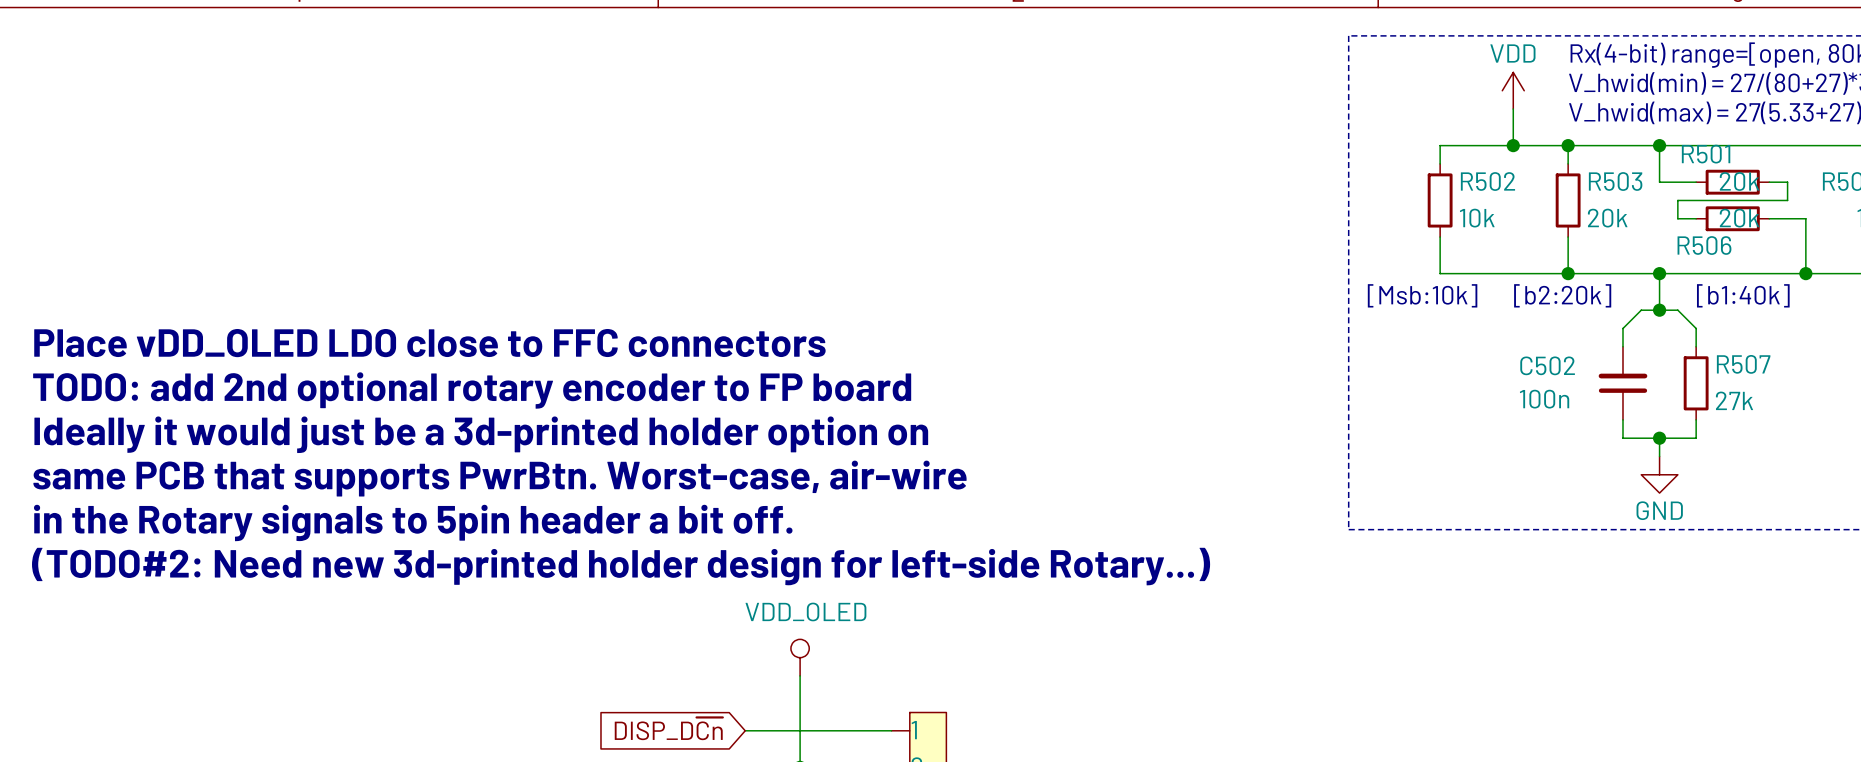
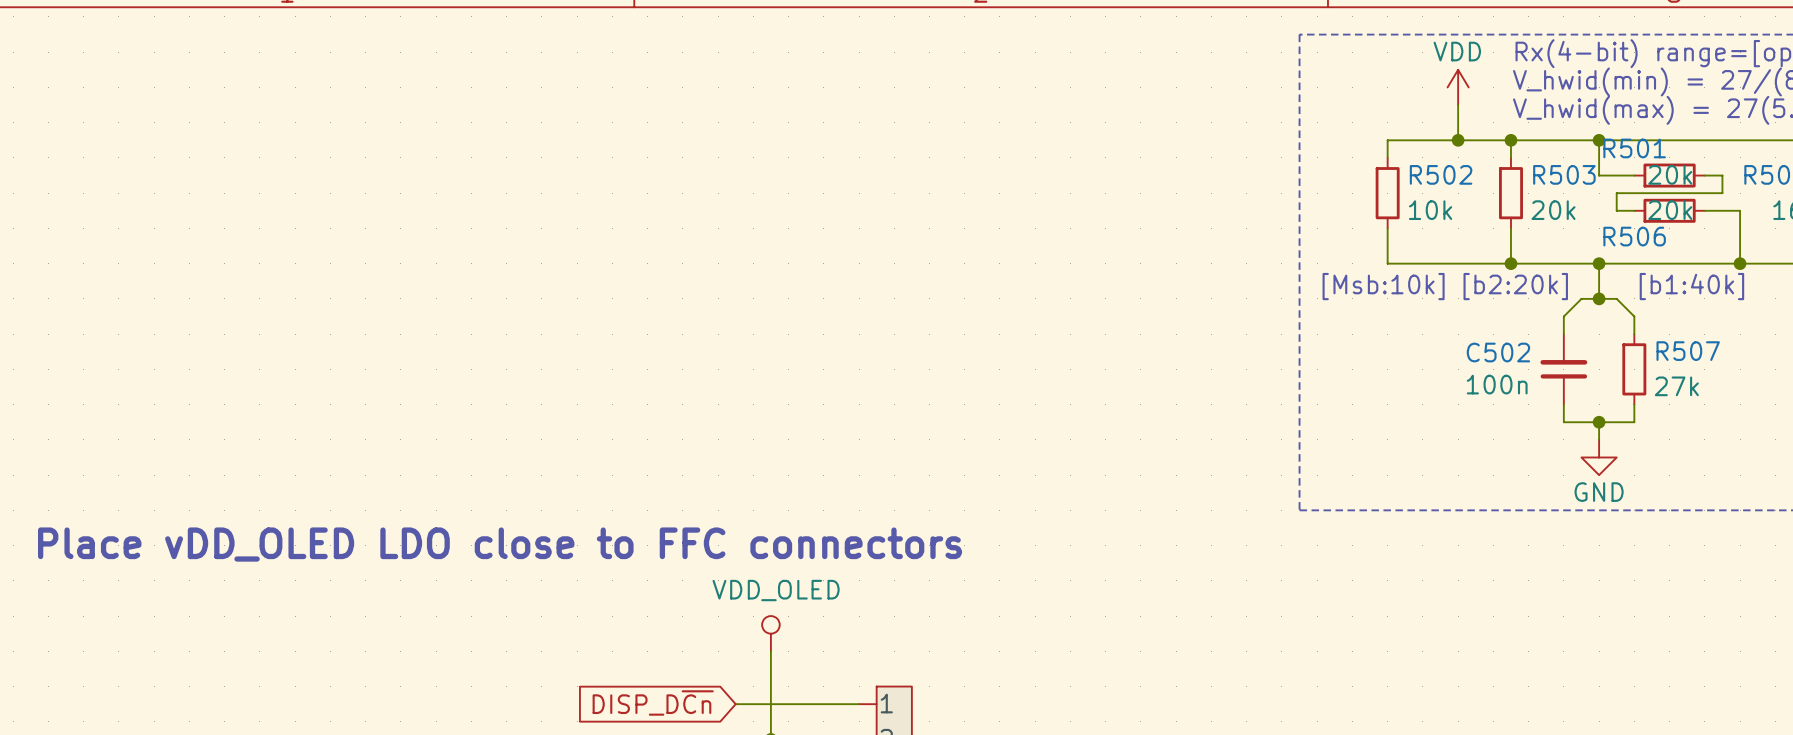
text: Place vDD_OLED LDO close to FFC connectors (429, 343) -> none
text: TODO: add 2nd optional rotary encoder to FP board (472, 390) -> none
text: Ideally it would just be a 3d-printed holder option on (481, 434) -> none
text: same PCB that supports PwrBtn. Worst-case, air-wire (500, 478) -> none
text: in the Rotary signals to 5pin header a bit off. (413, 522) -> none
text: (TODO#2: Need new 3d-printed holder design for left-side Rotary...) (621, 566) -> Place vDD_OLED LDO close to FFC connectors (500, 544)
global label position: DISP_D~{Cn} (668, 728) -> DISP_D~{Cn} (653, 702)
wire: (745, 730) (763, 730) -> none

